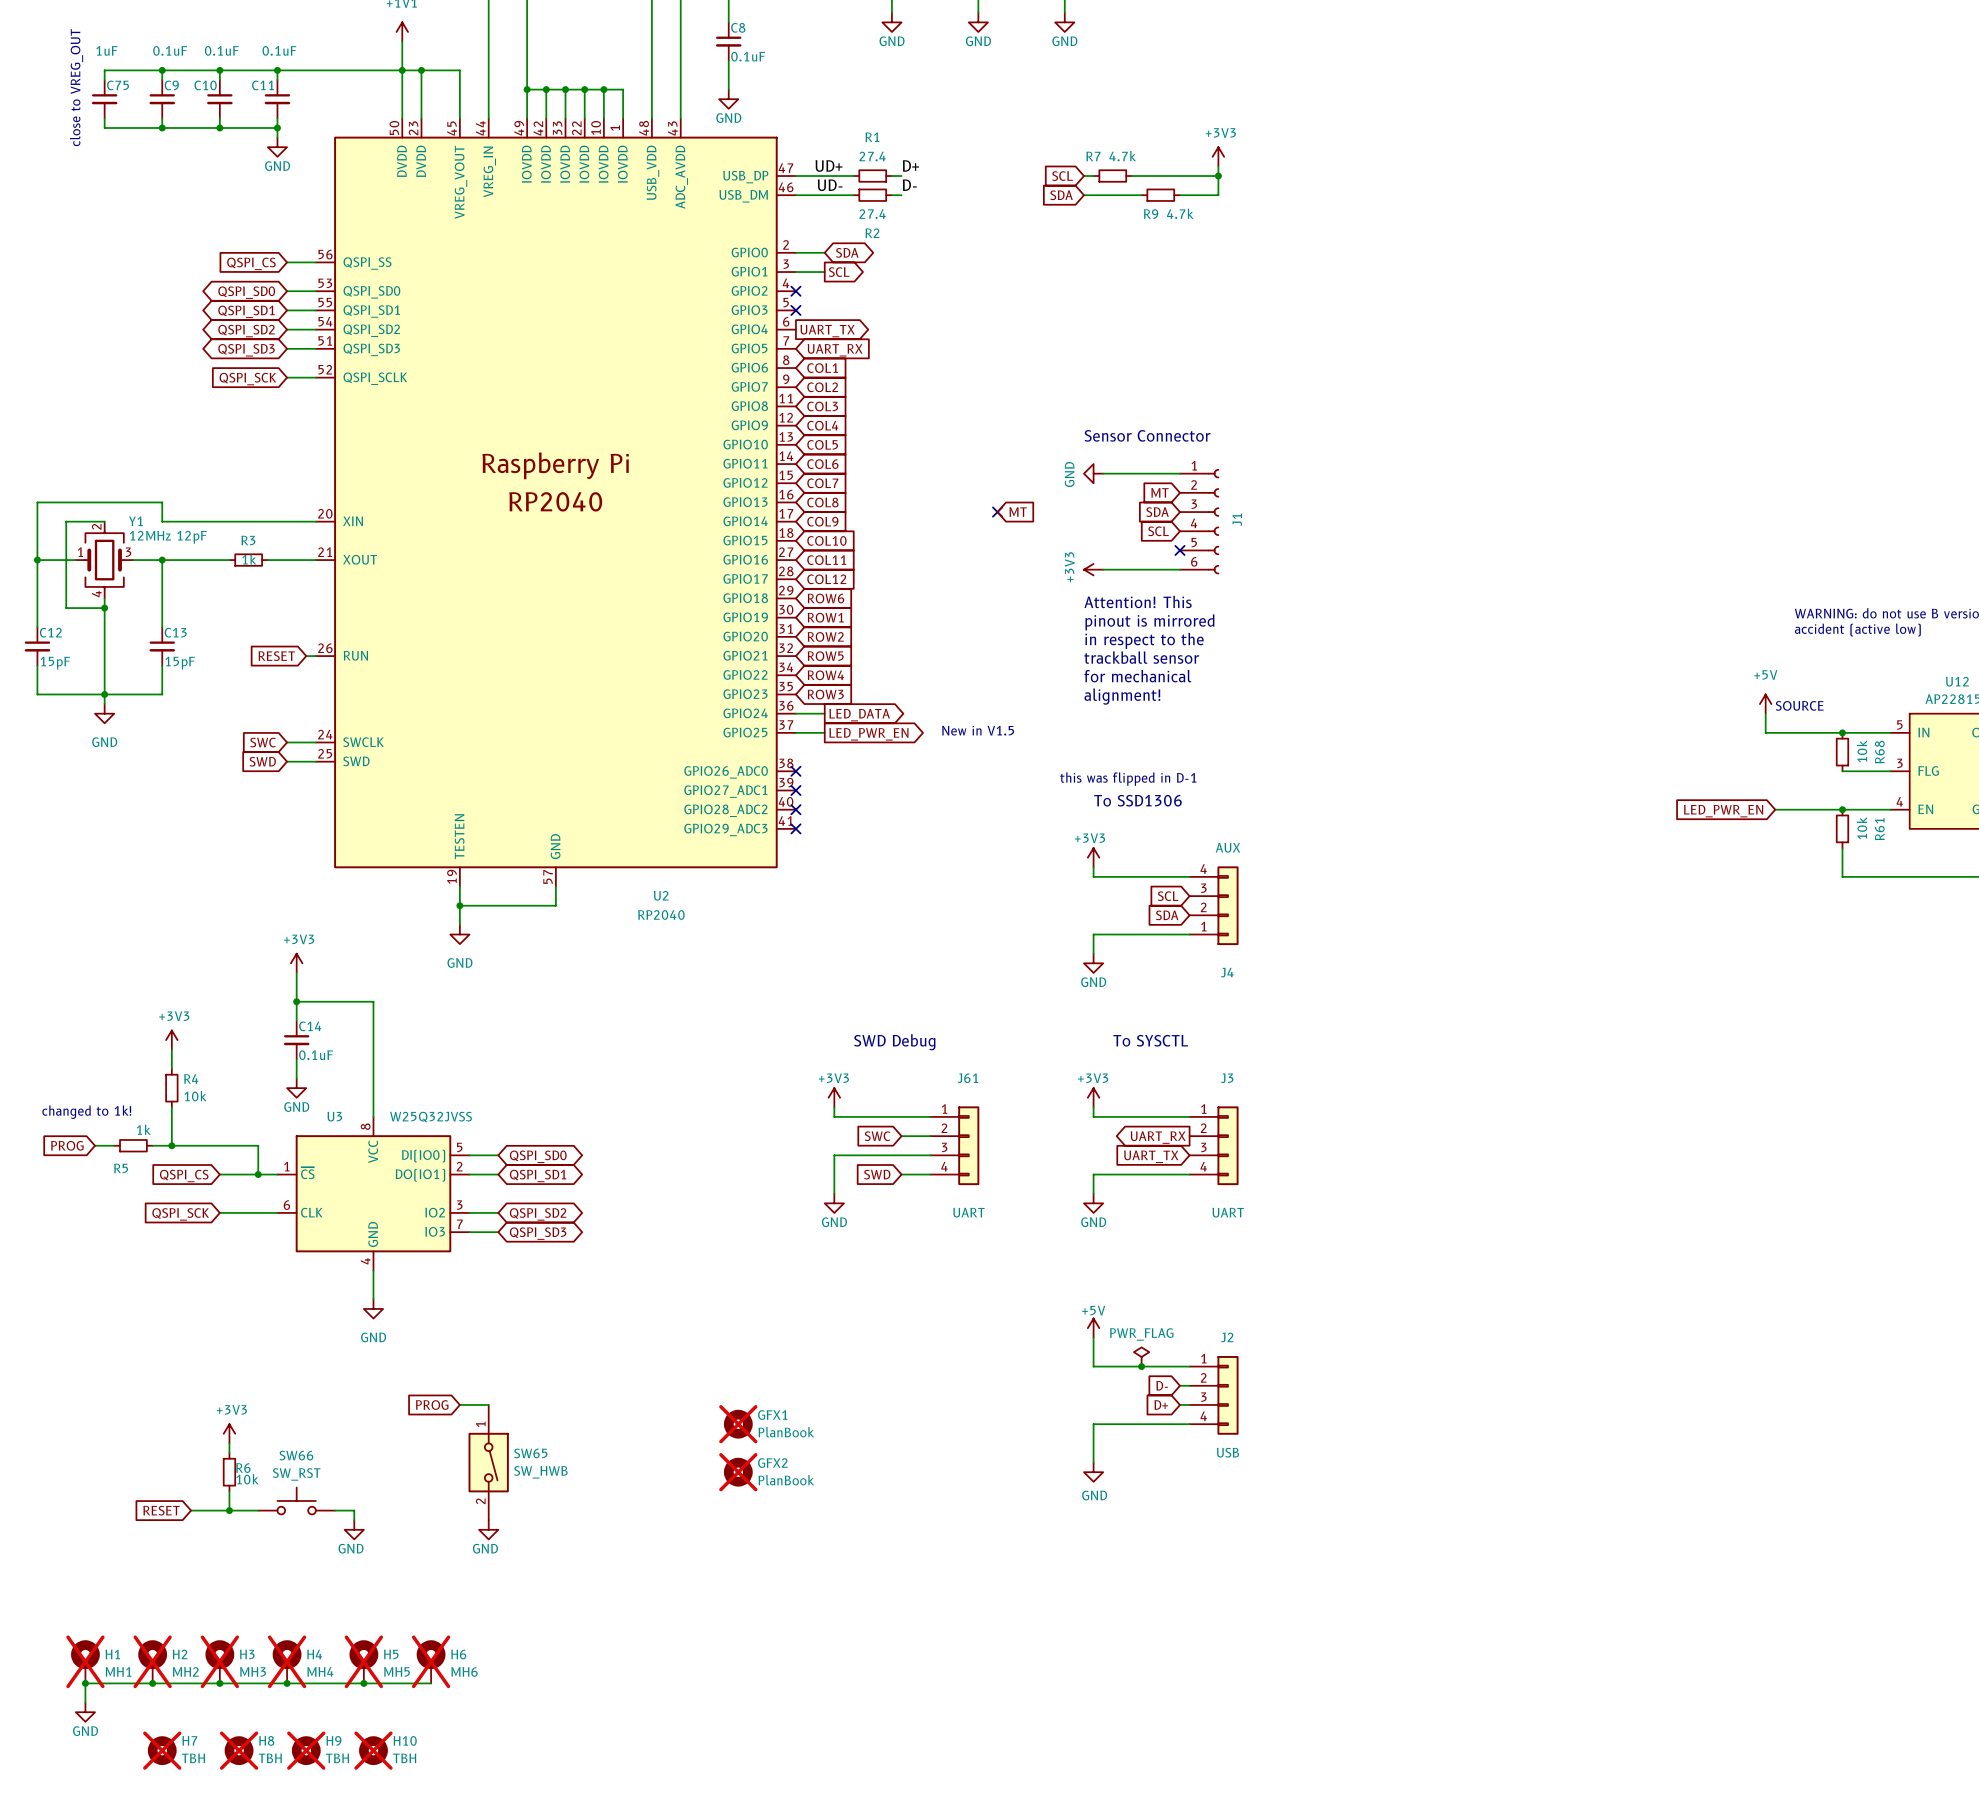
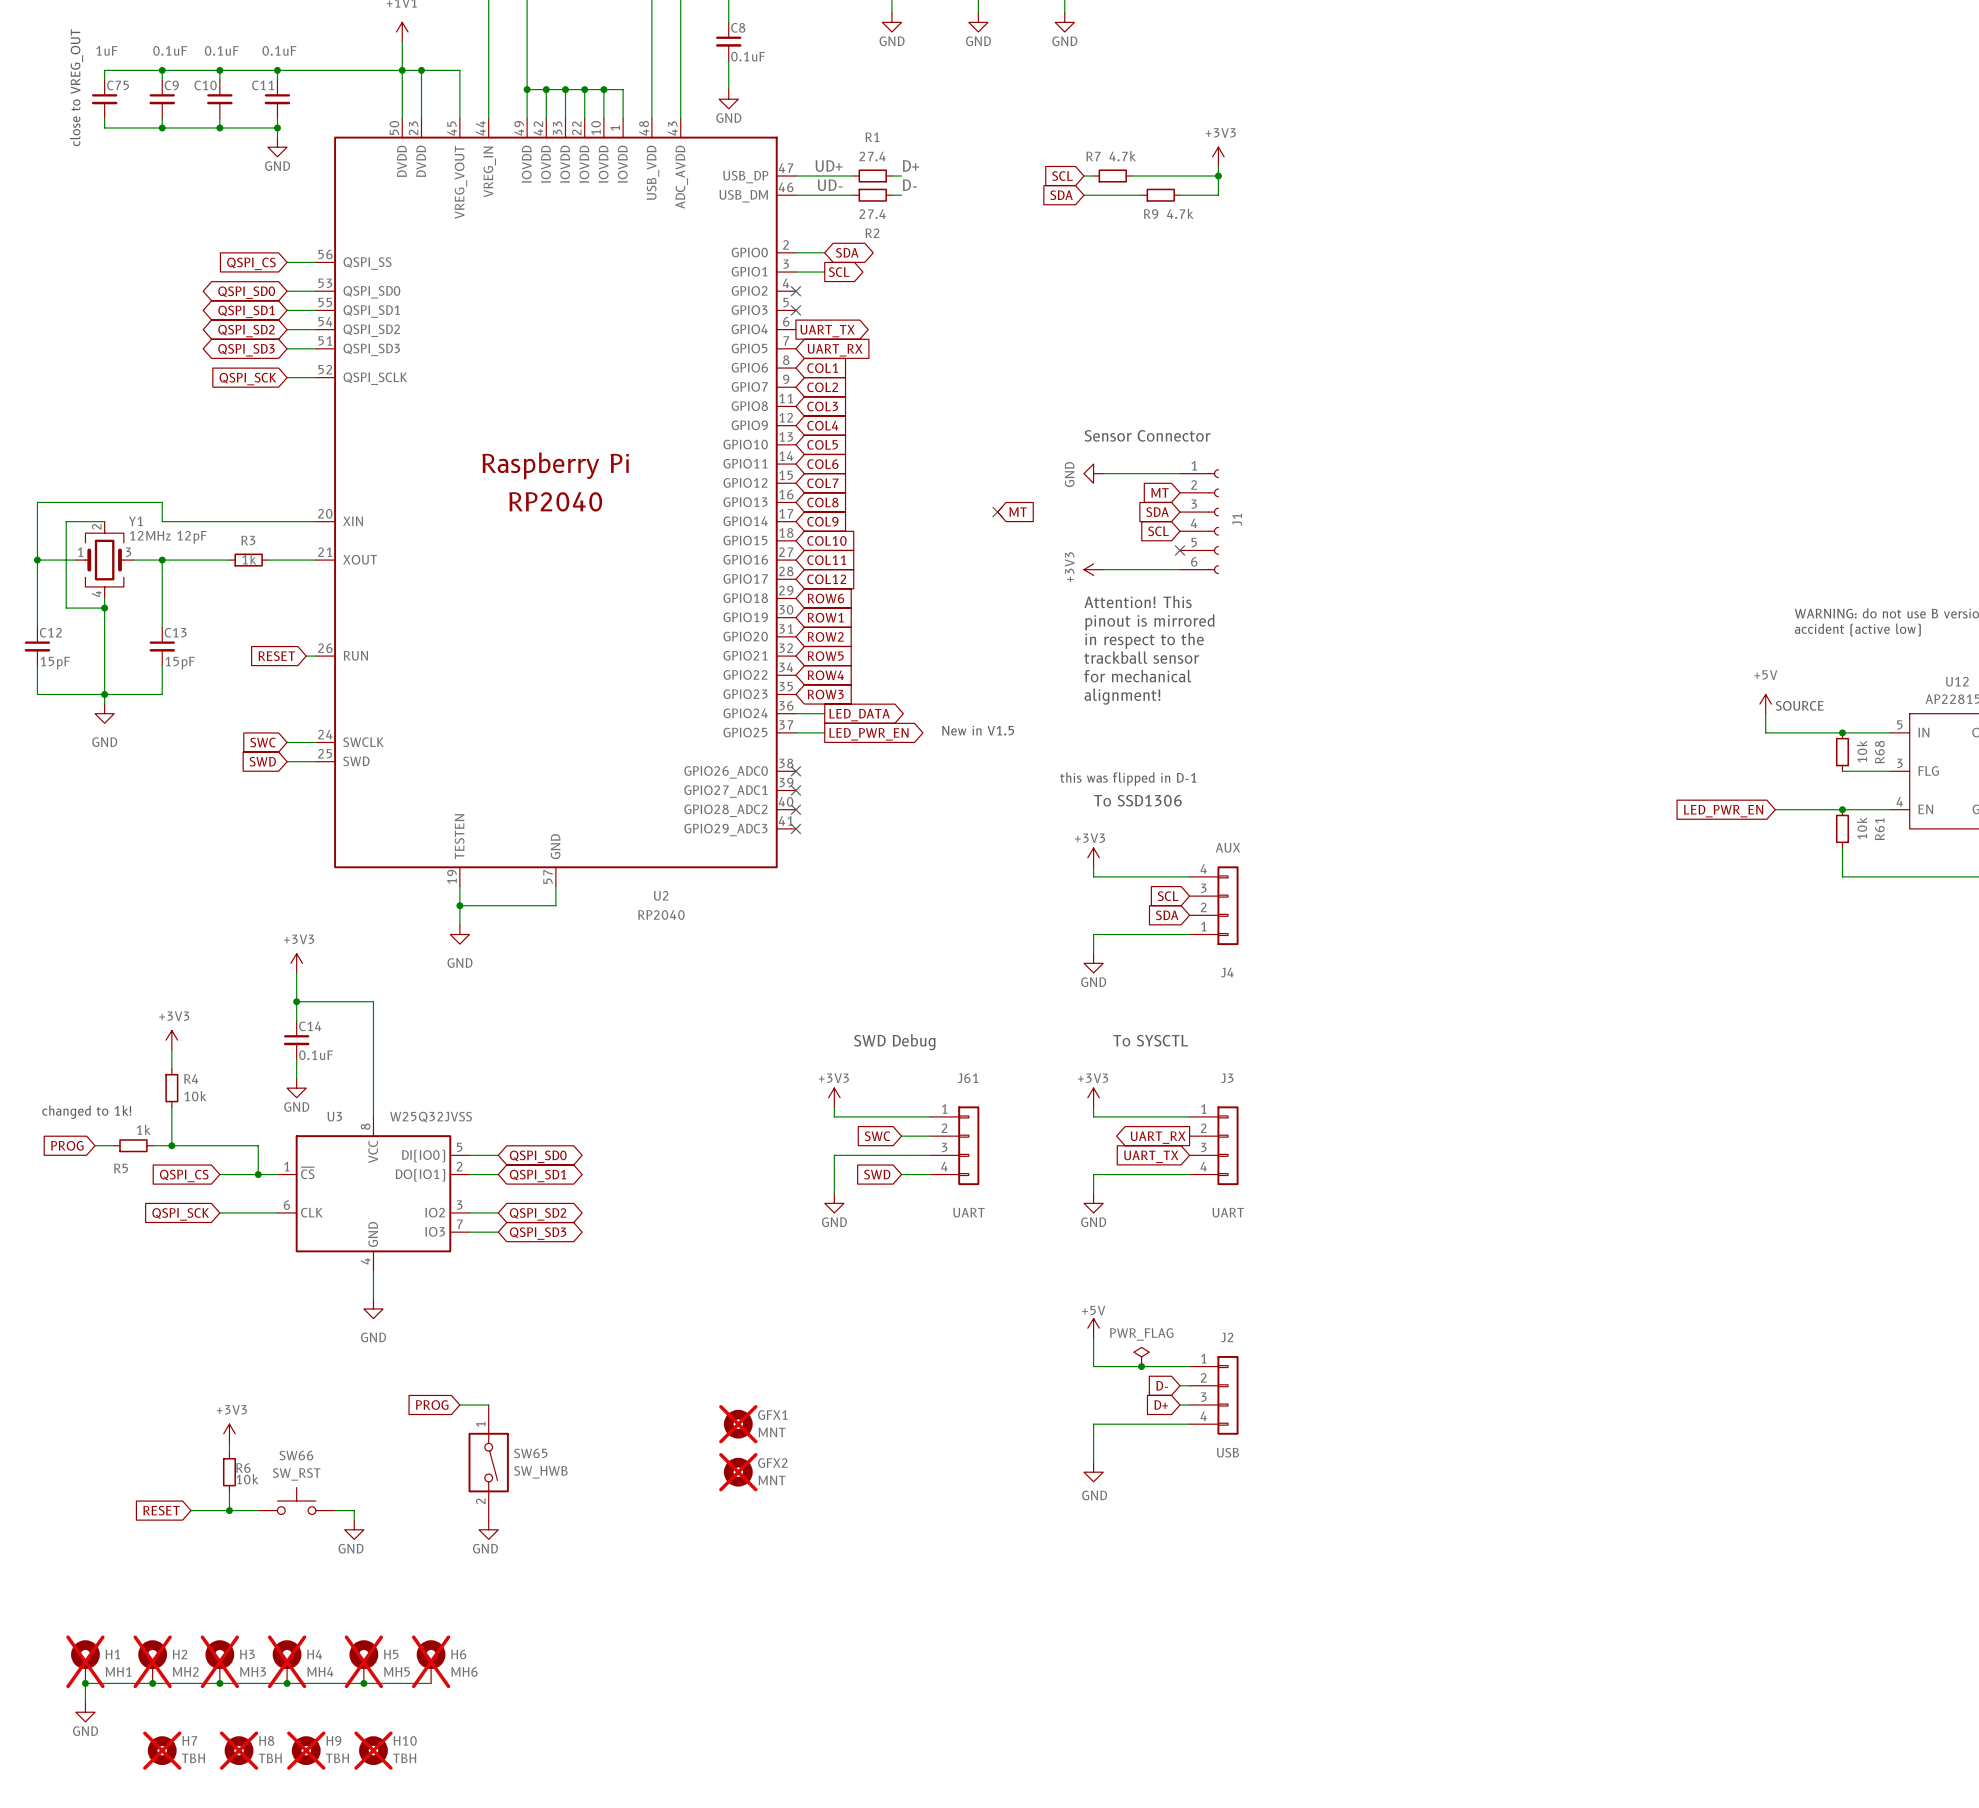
GFX1 value: PlanBook (786, 1432) -> MNT (772, 1432)
GFX2 value: PlanBook (786, 1480) -> MNT (772, 1480)

